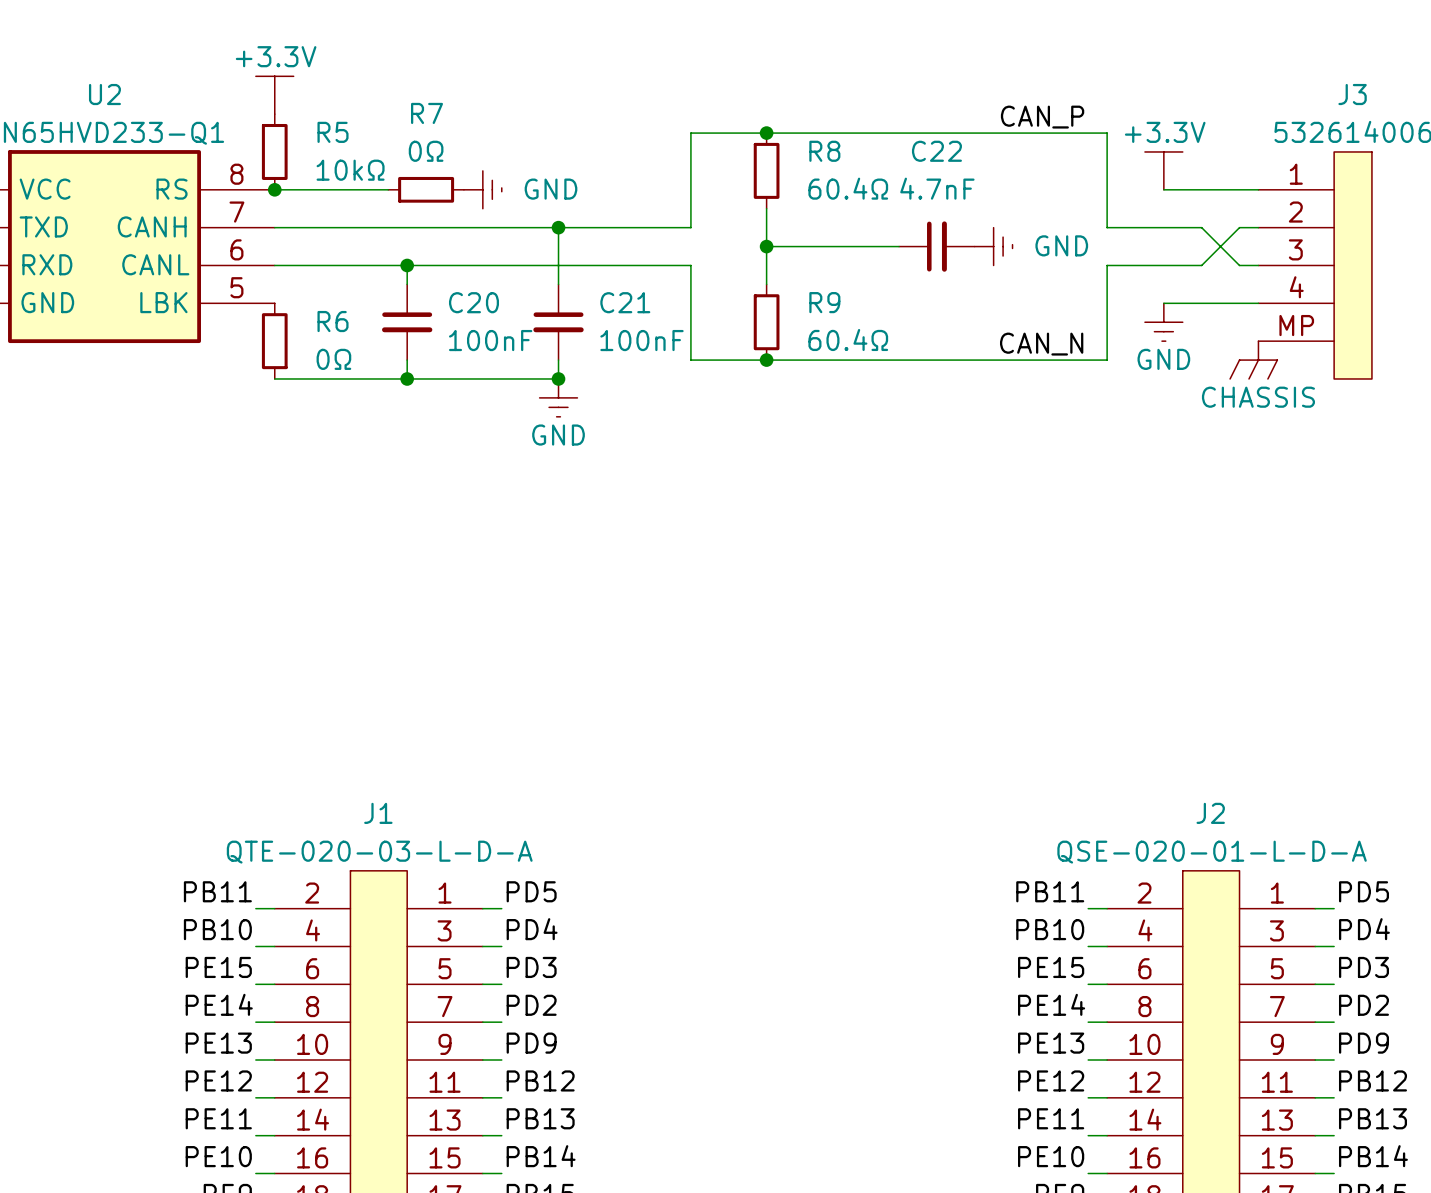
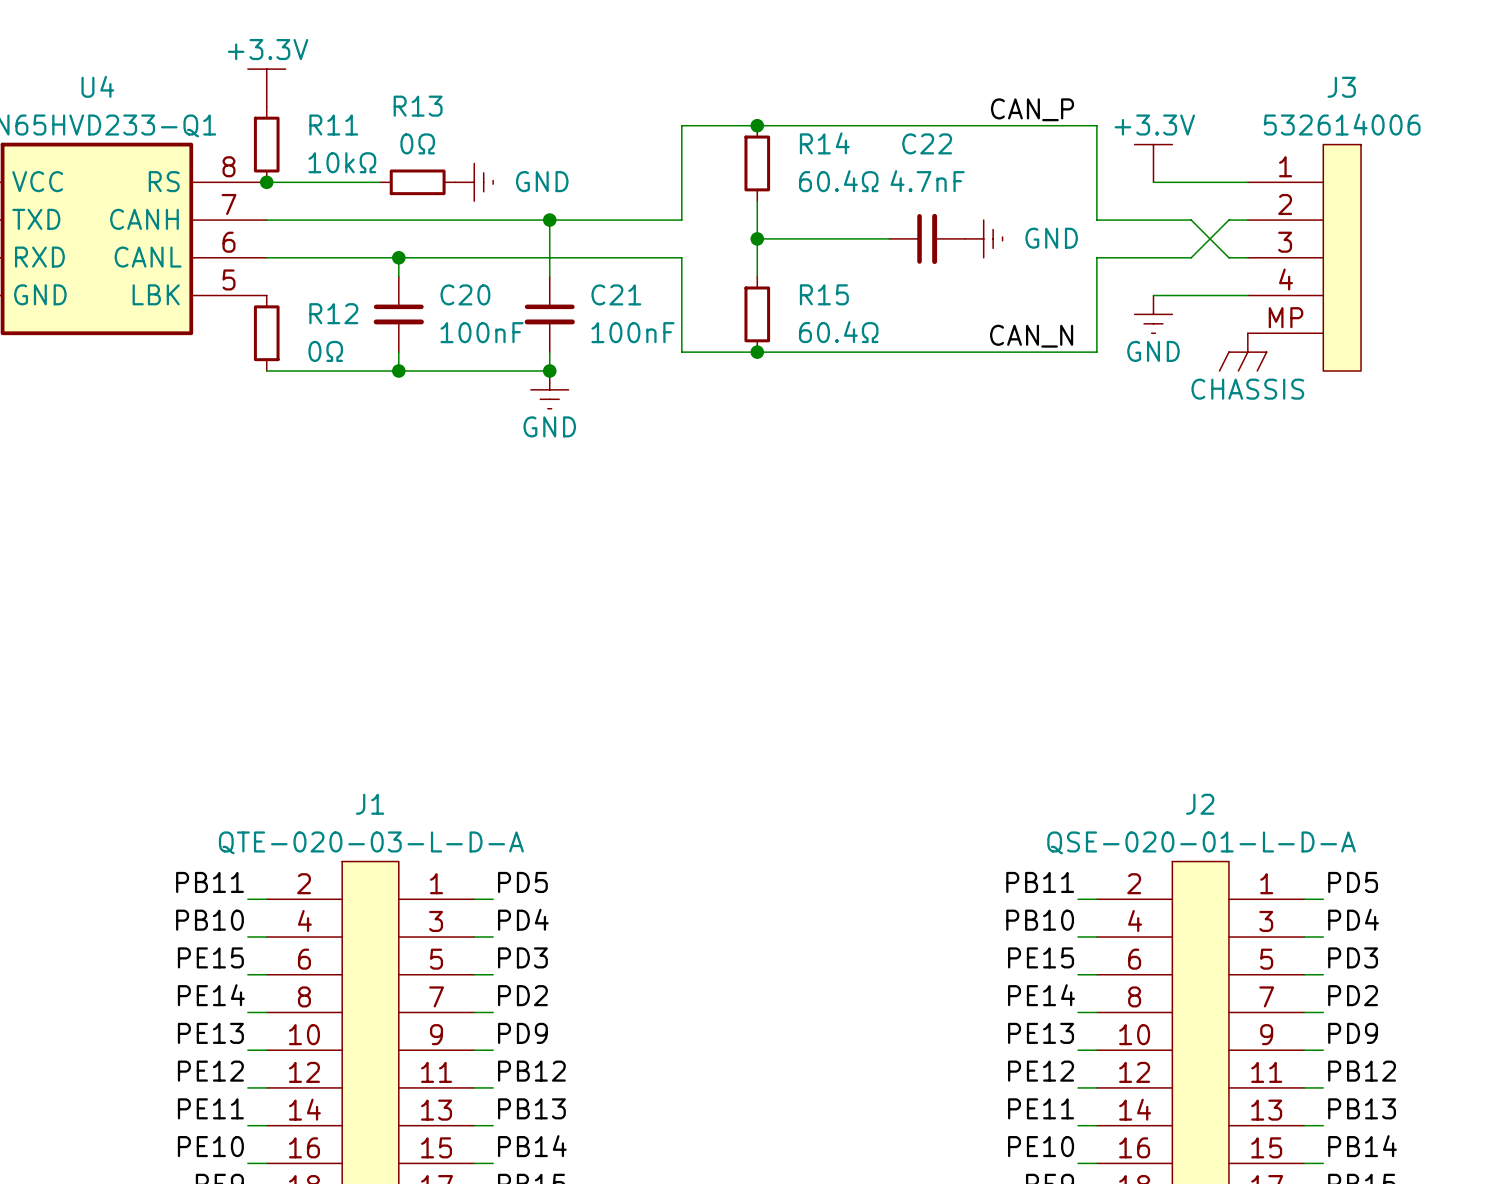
U2 name: U2 (104, 94) -> U4 (97, 86)
R7 name: R7 (427, 113) -> R13 (418, 106)
R5 name: R5 (333, 132) -> R11 (333, 125)
R8 name: R8 (824, 151) -> R14 (824, 143)
R9 name: R9 (824, 302) -> R15 (824, 294)
R6 name: R6 (333, 321) -> R12 (333, 313)

